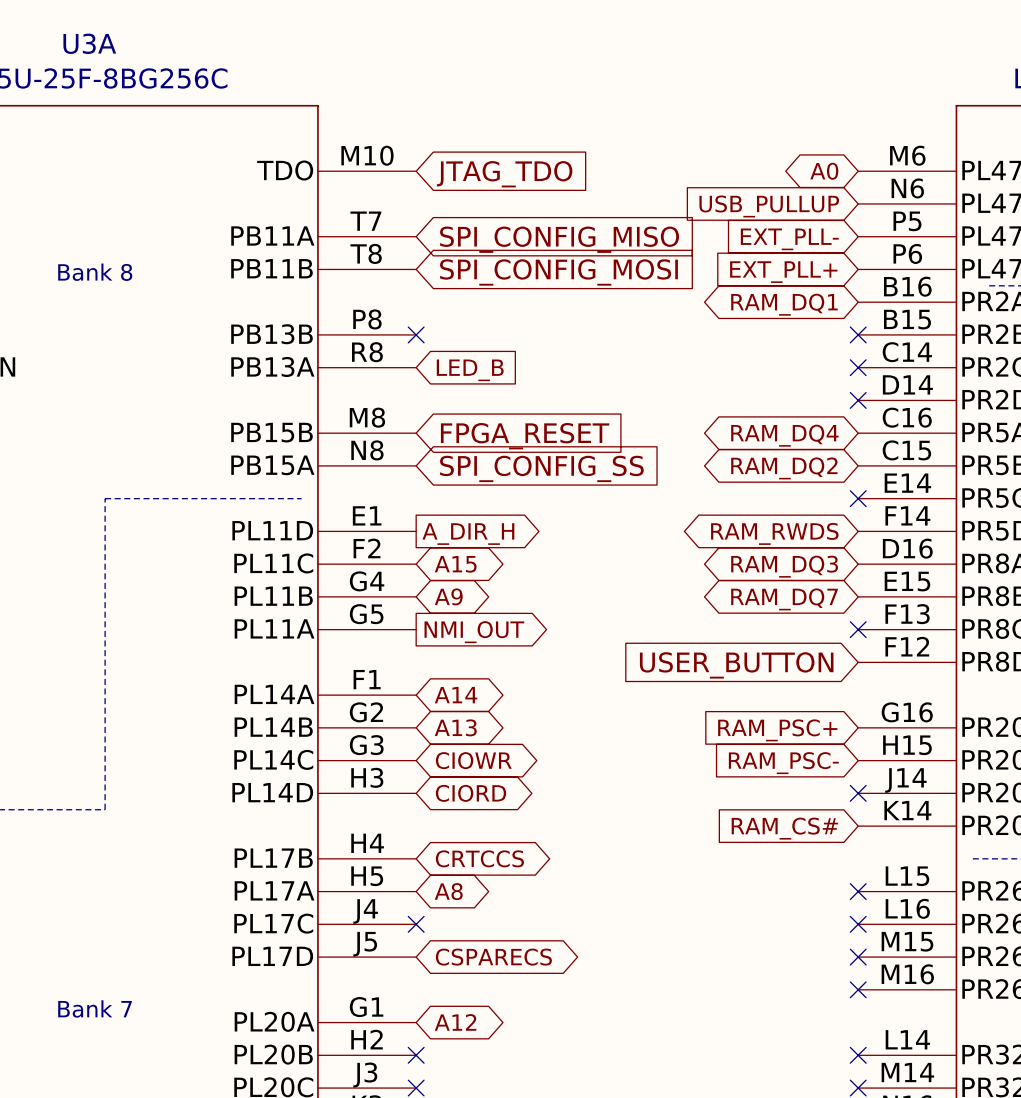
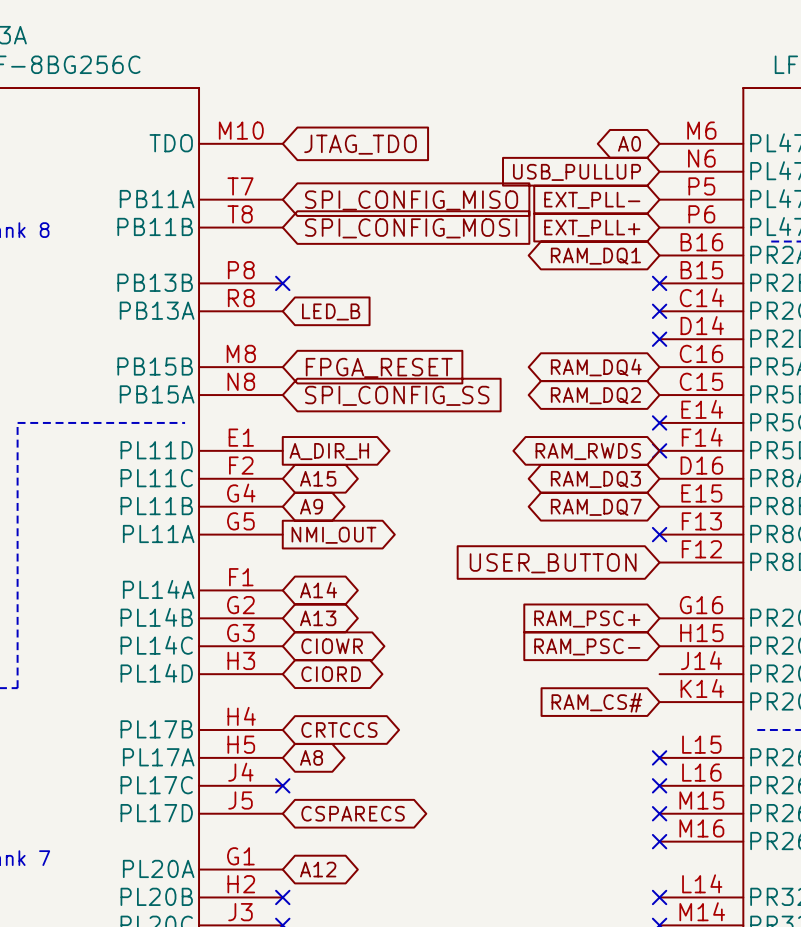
no-connect mark: none -> (659, 450)
no-connect mark: (858, 793) -> none

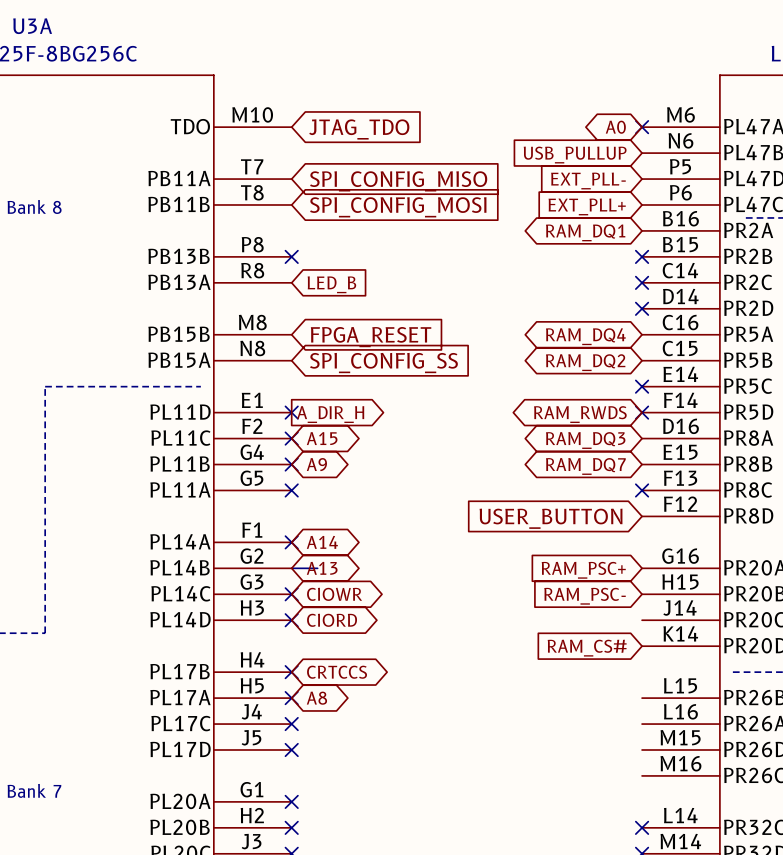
no-connect mark: none -> (642, 127)
no-connect mark: none -> (291, 412)
no-connect mark: none -> (291, 438)
no-connect mark: none -> (291, 464)
no-connect mark: none -> (291, 490)
global label: NMI_OUT (333, 535) -> none
no-connect mark: none -> (291, 542)
wire: none -> (291, 568) (317, 568)
no-connect mark: none -> (291, 594)
no-connect mark: none -> (291, 620)
no-connect mark: none -> (291, 672)
no-connect mark: none -> (291, 698)
no-connect mark: (659, 757) -> none
no-connect mark: (659, 785) -> none
no-connect mark: none -> (291, 749)
global label: CSPARECS (353, 813) -> none
no-connect mark: (659, 813) -> none
no-connect mark: (659, 841) -> none
no-connect mark: none -> (291, 801)
global label: A12 (318, 869) -> none

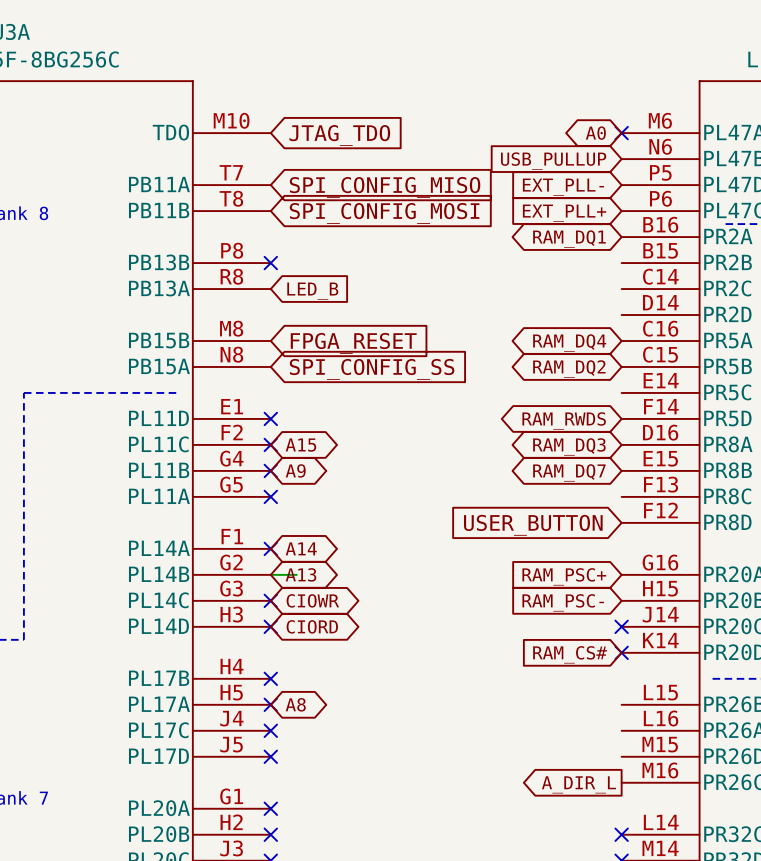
no-connect mark: (642, 256) -> none
no-connect mark: (642, 282) -> none
no-connect mark: (642, 308) -> none
no-connect mark: (642, 386) -> none
no-connect mark: (642, 412) -> none
global label: A_DIR_H (330, 414) -> none
no-connect mark: (642, 490) -> none
no-connect mark: none -> (621, 626)
no-connect mark: none -> (621, 652)
global label: CRTCCS (337, 672) -> none
global label: none -> A_DIR_L (578, 784)

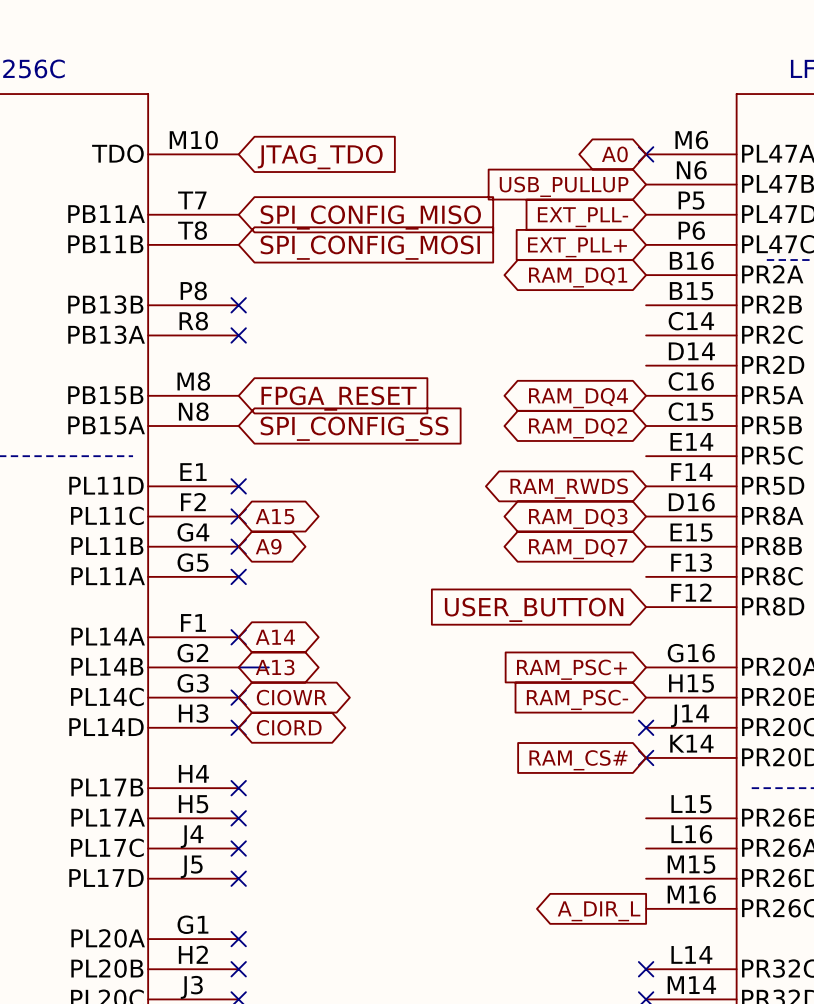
no-connect mark: none -> (238, 335)
global label: LED_B (312, 291) -> none
global label: A8 (295, 704) -> none

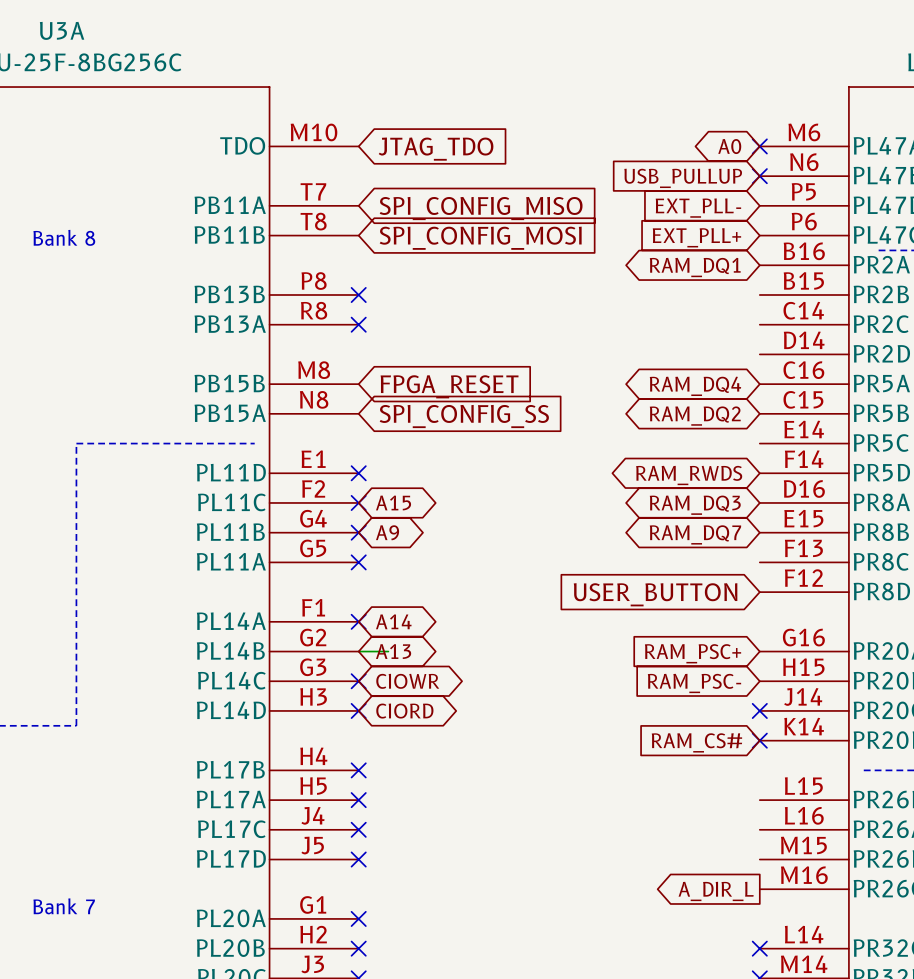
no-connect mark: none -> (759, 176)

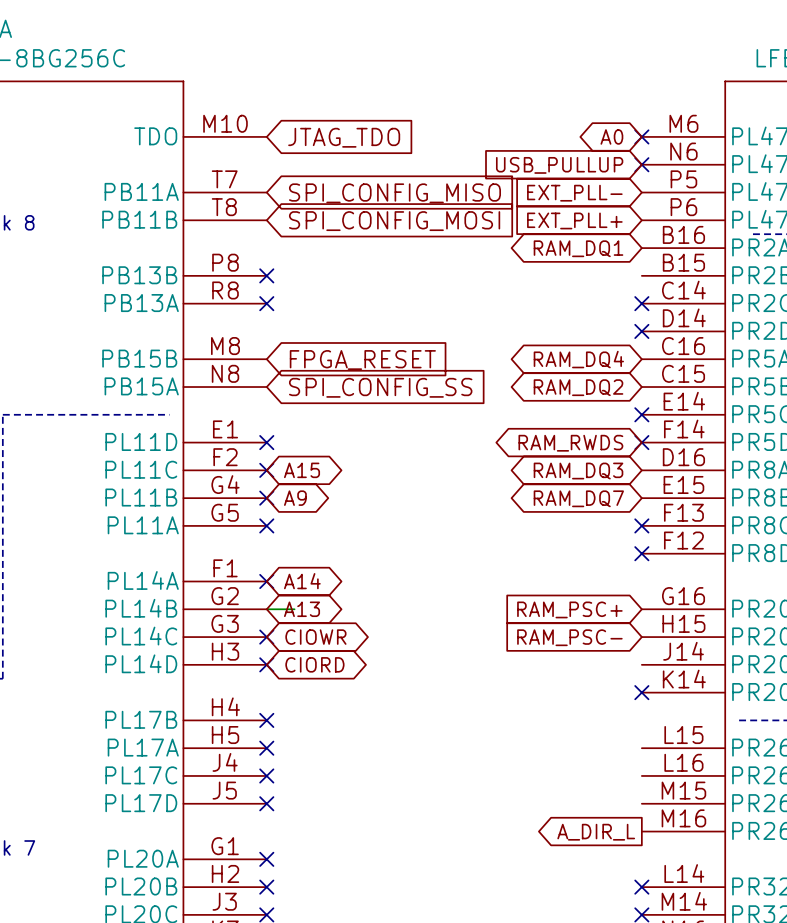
no-connect mark: none -> (641, 303)
no-connect mark: none -> (641, 331)
no-connect mark: none -> (641, 414)
no-connect mark: none -> (641, 442)
no-connect mark: none -> (641, 525)
no-connect mark: none -> (641, 553)
global label: USER_BUTTON (655, 594) -> none
no-connect mark: (759, 710) -> none
global label: RAM_CS# (696, 742) -> none

